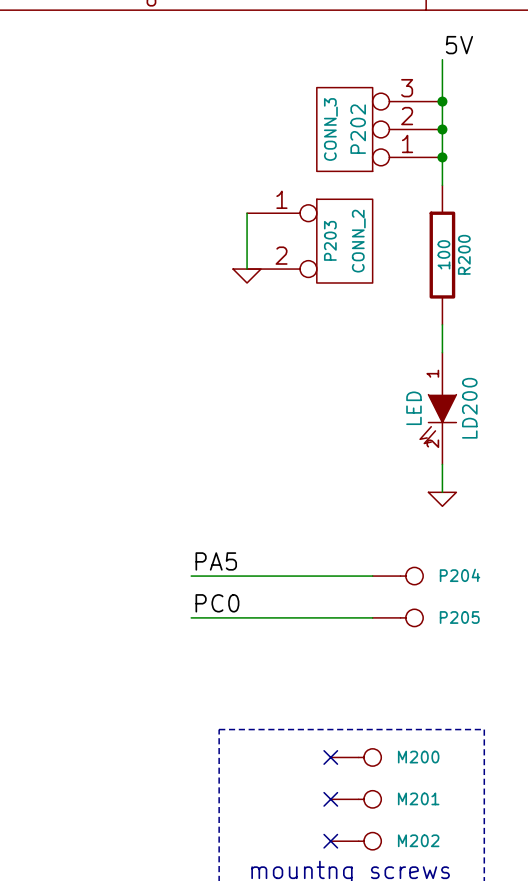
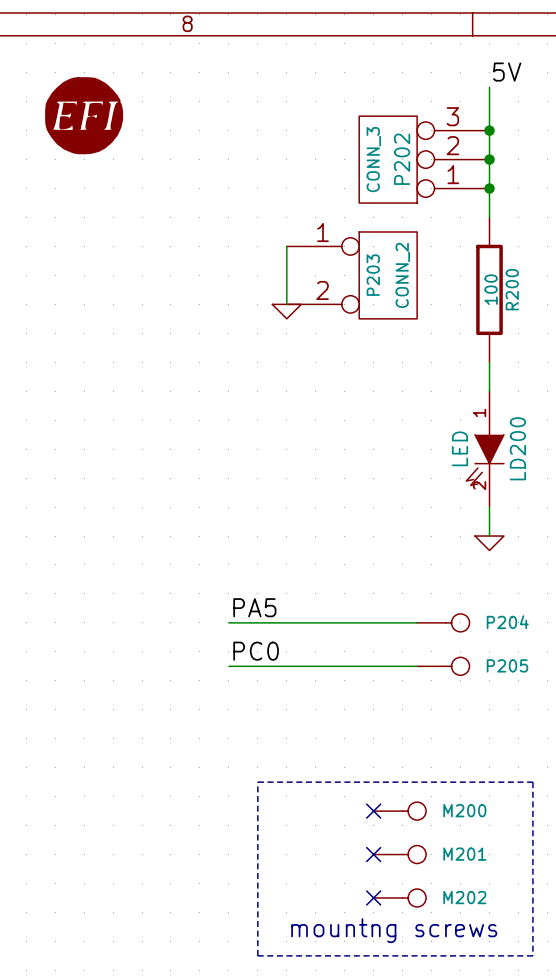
part: none -> (84, 115)

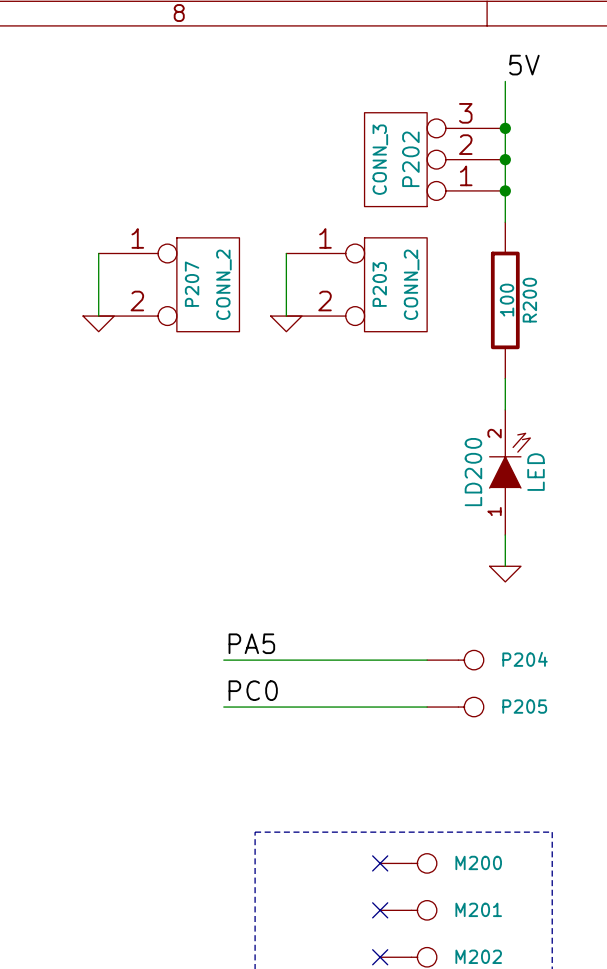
part: (84, 115) -> none
wire: none -> (98, 253) (98, 316)
P207: none -> CONN_2 (169, 284)
power symbol: none -> (98, 323)
LD200 rotation: 0° (485, 460) -> 180° (510, 460)

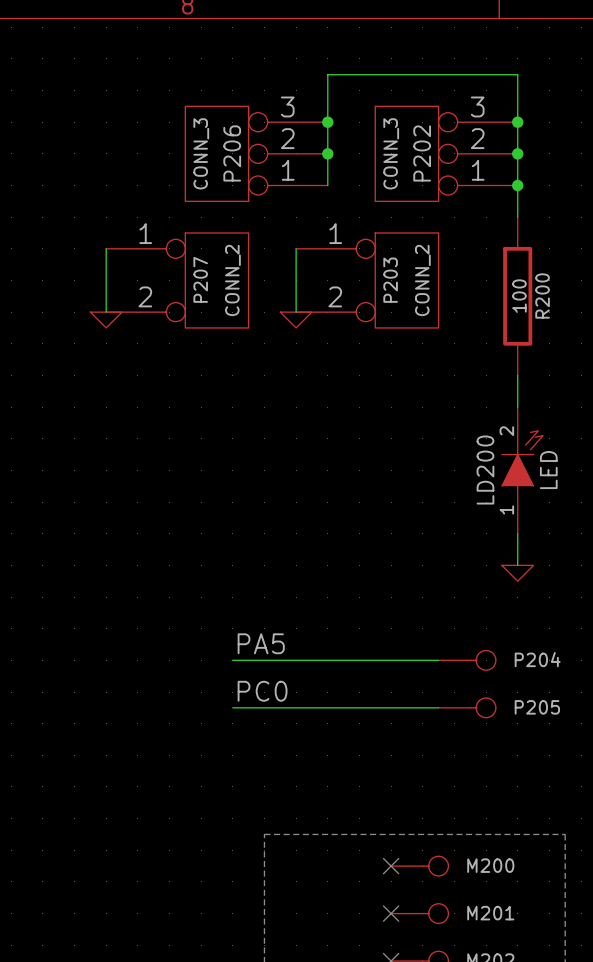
label: 5V (524, 65) -> none
wire: none -> (517, 74) (327, 74) (327, 185)
junction: none -> (327, 122)
P206: none -> CONN_3 (256, 153)
junction: none -> (327, 153)

